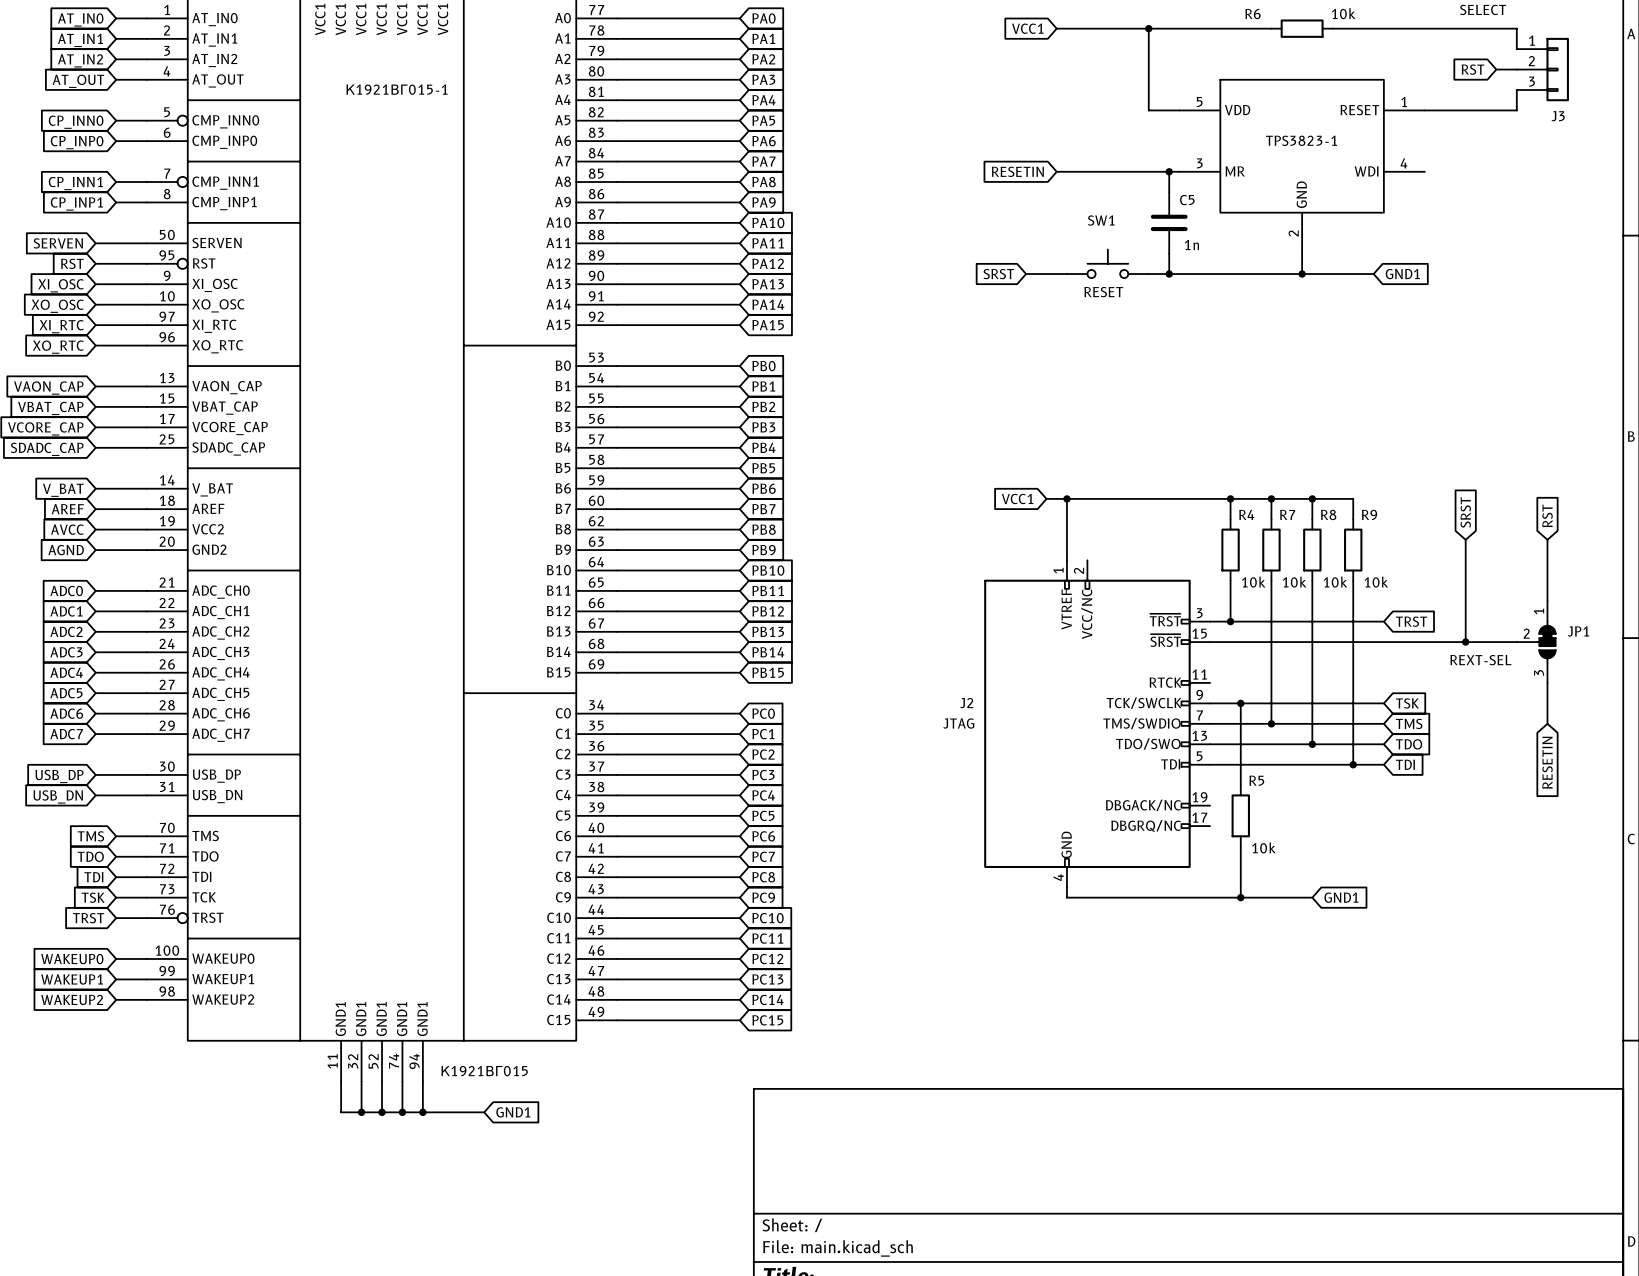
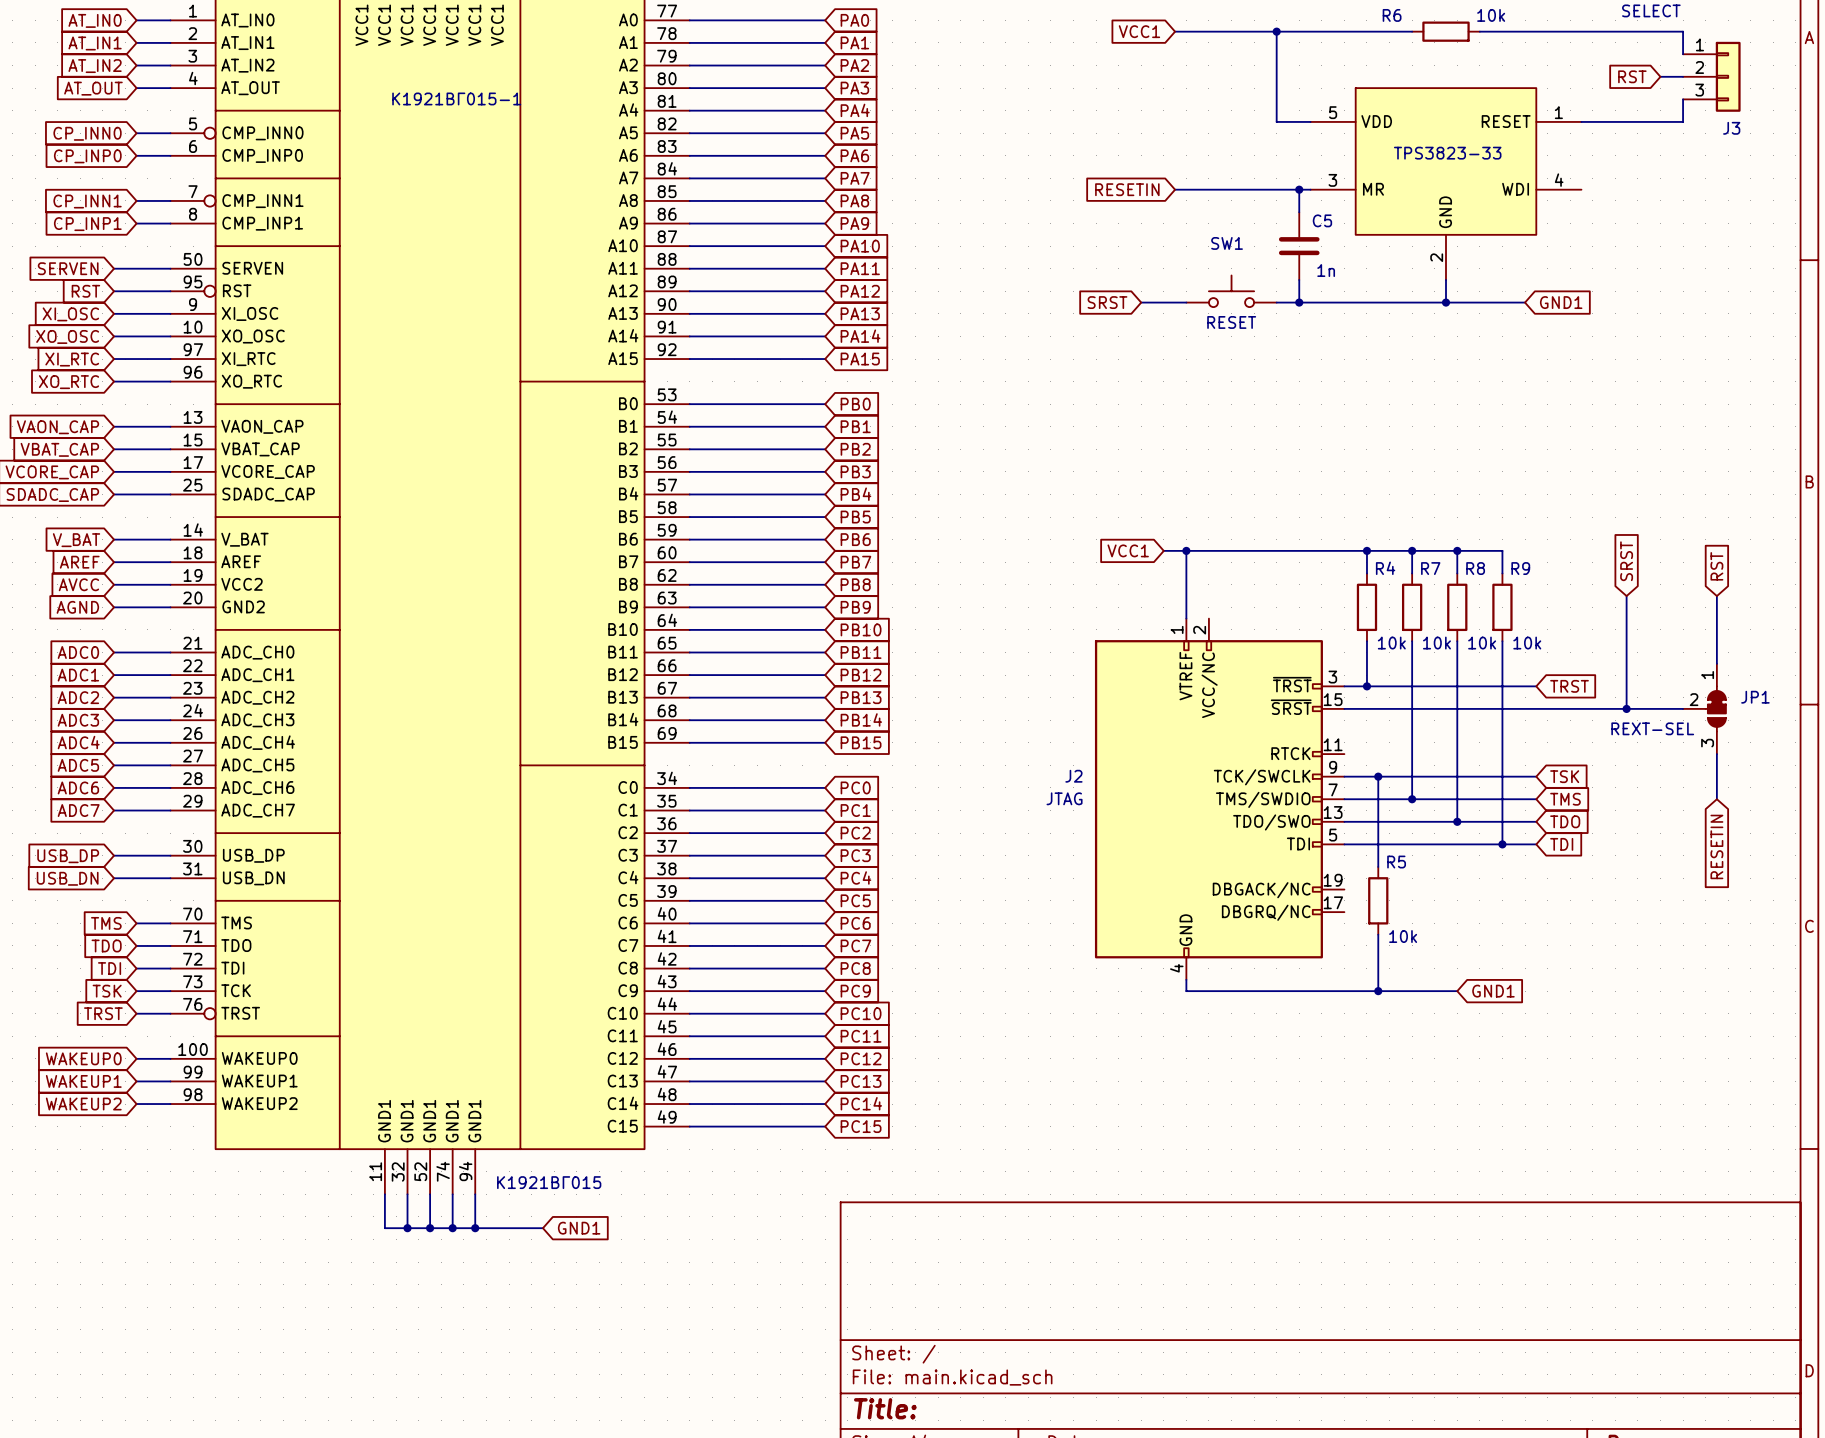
TPS3823-1 value: none -> TPS3823-33 (1447, 153)
TPS3823-1 name: TPS3823-1 (1301, 140) -> none

